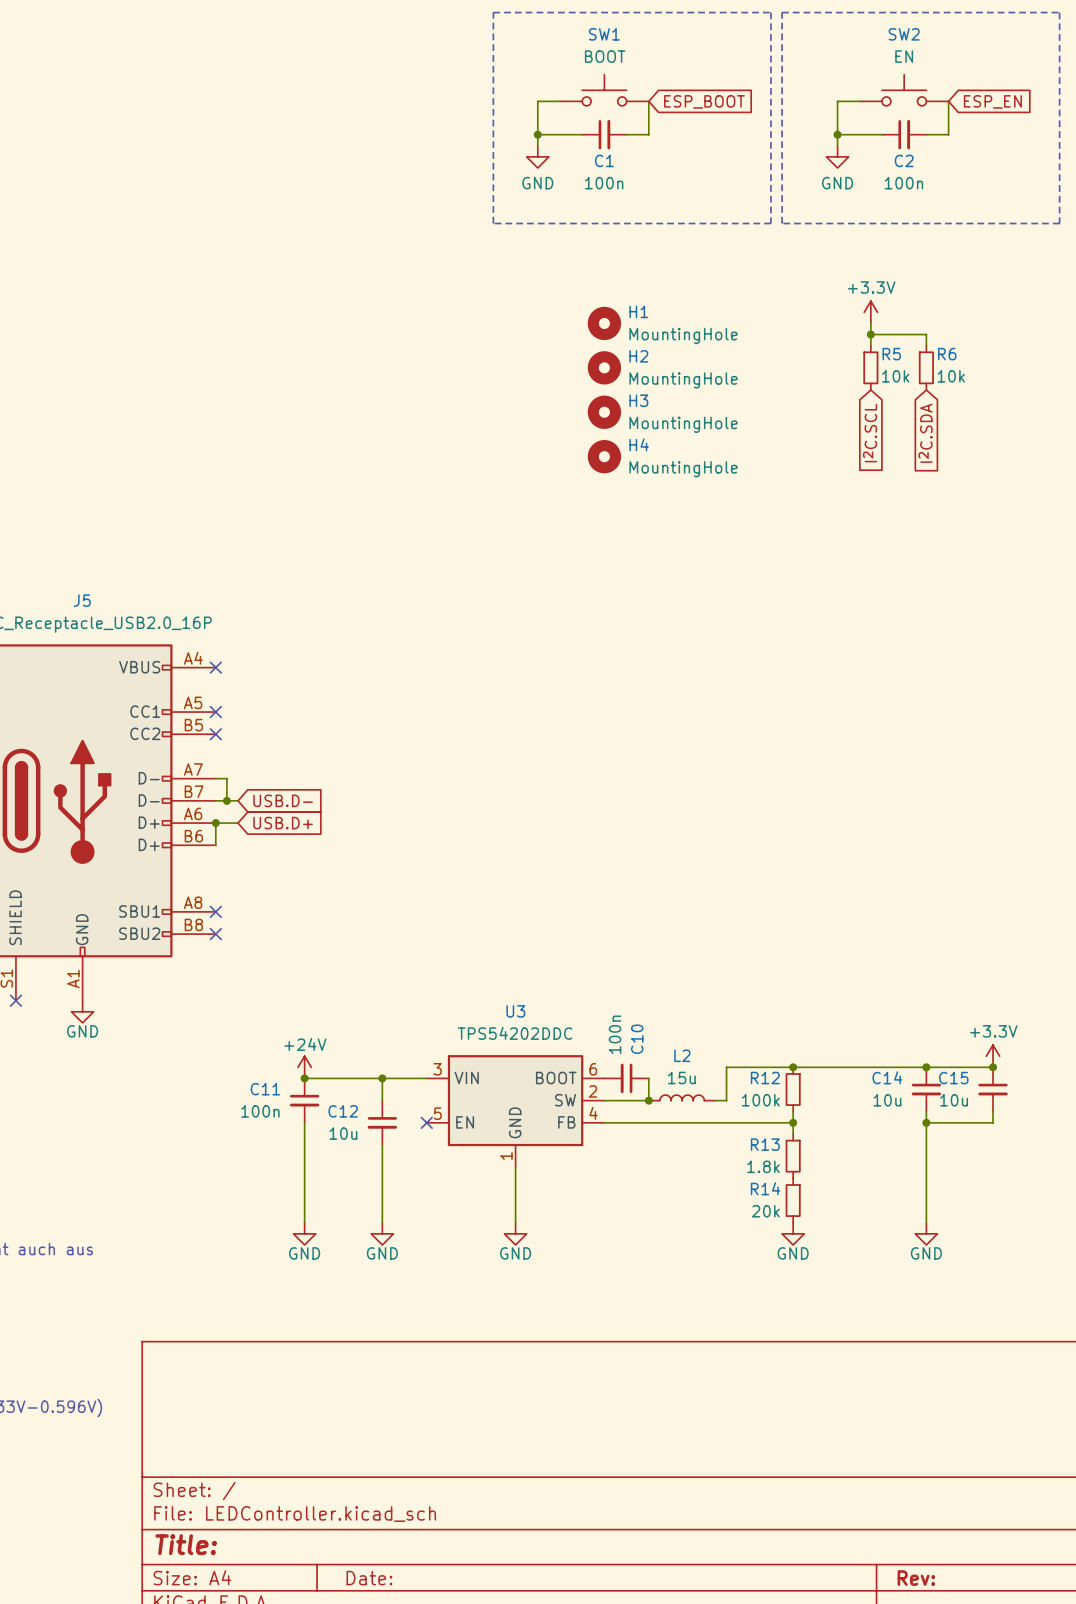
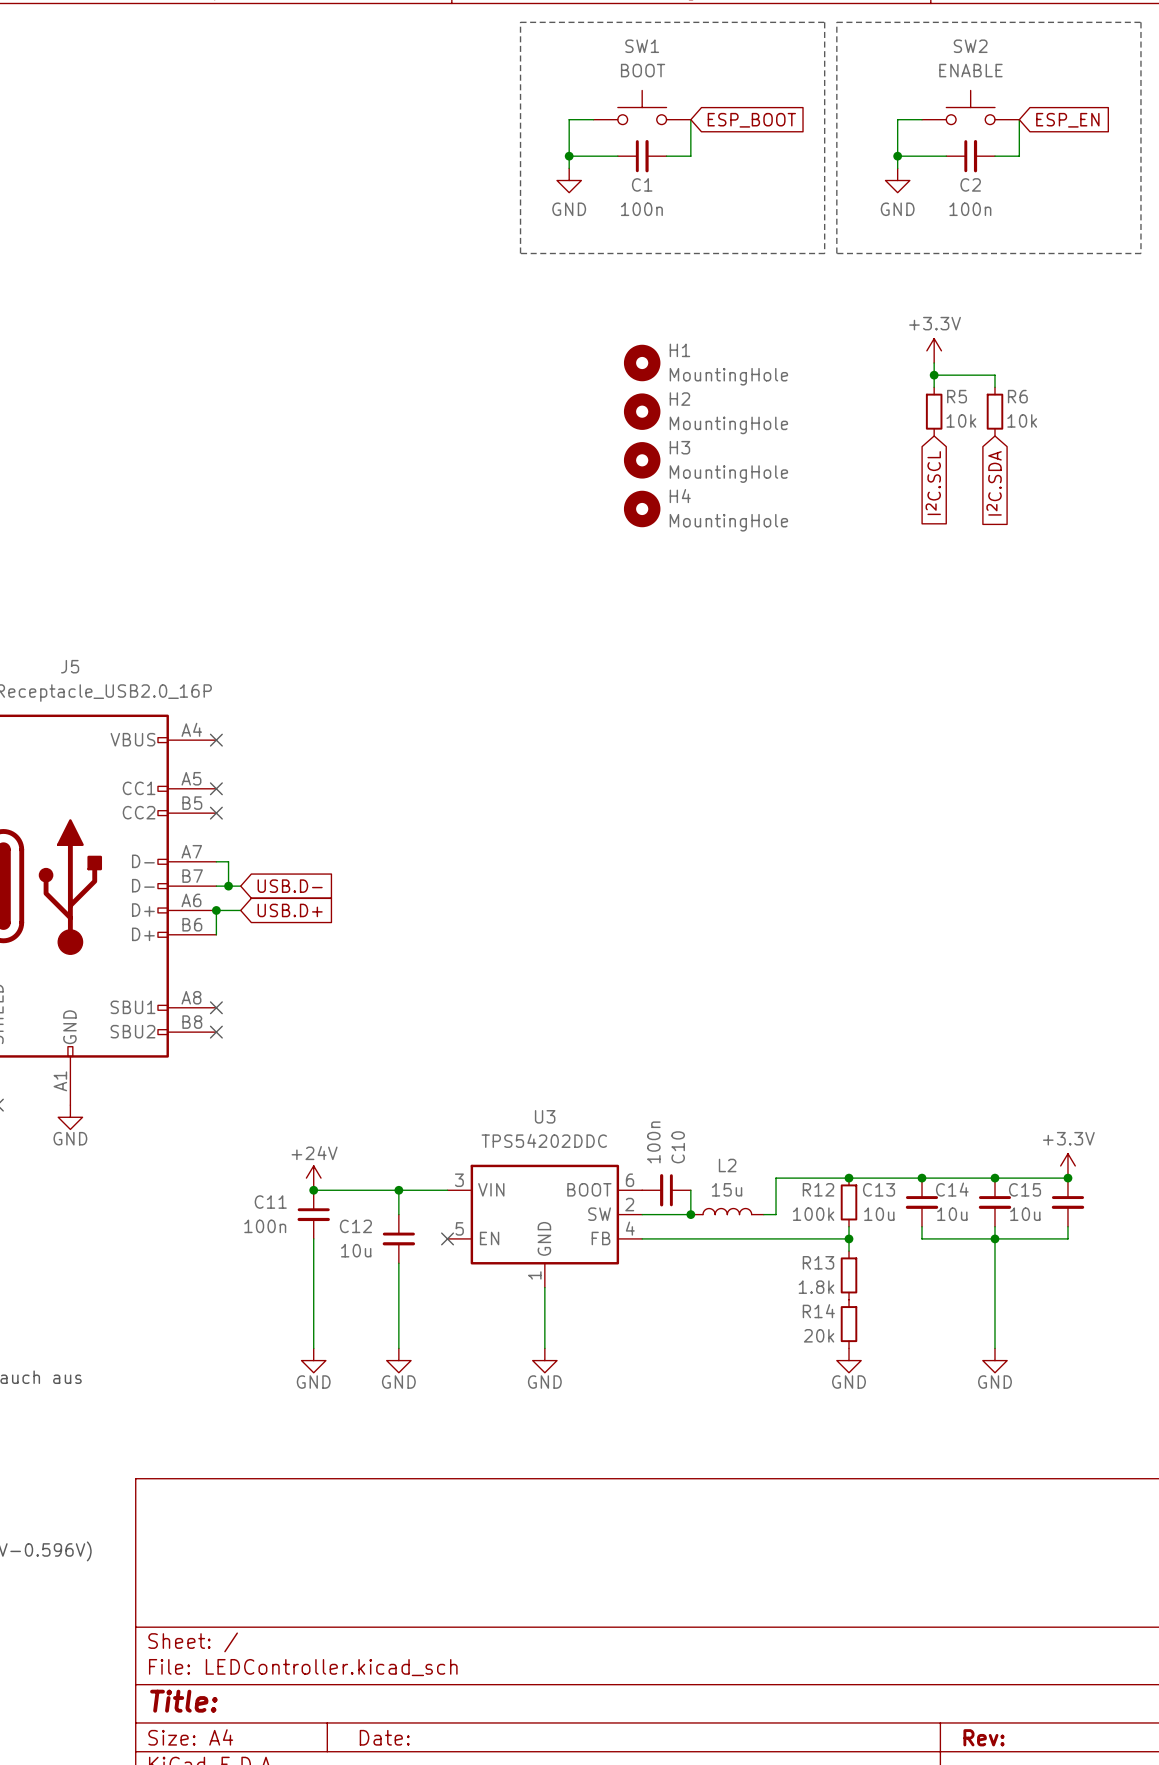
SW2 value: EN (904, 56) -> ENABLE (970, 70)
junction: none -> (921, 1178)
C13: none -> 10u (921, 1202)
wire: none -> (921, 1226) (921, 1238) (994, 1238)

